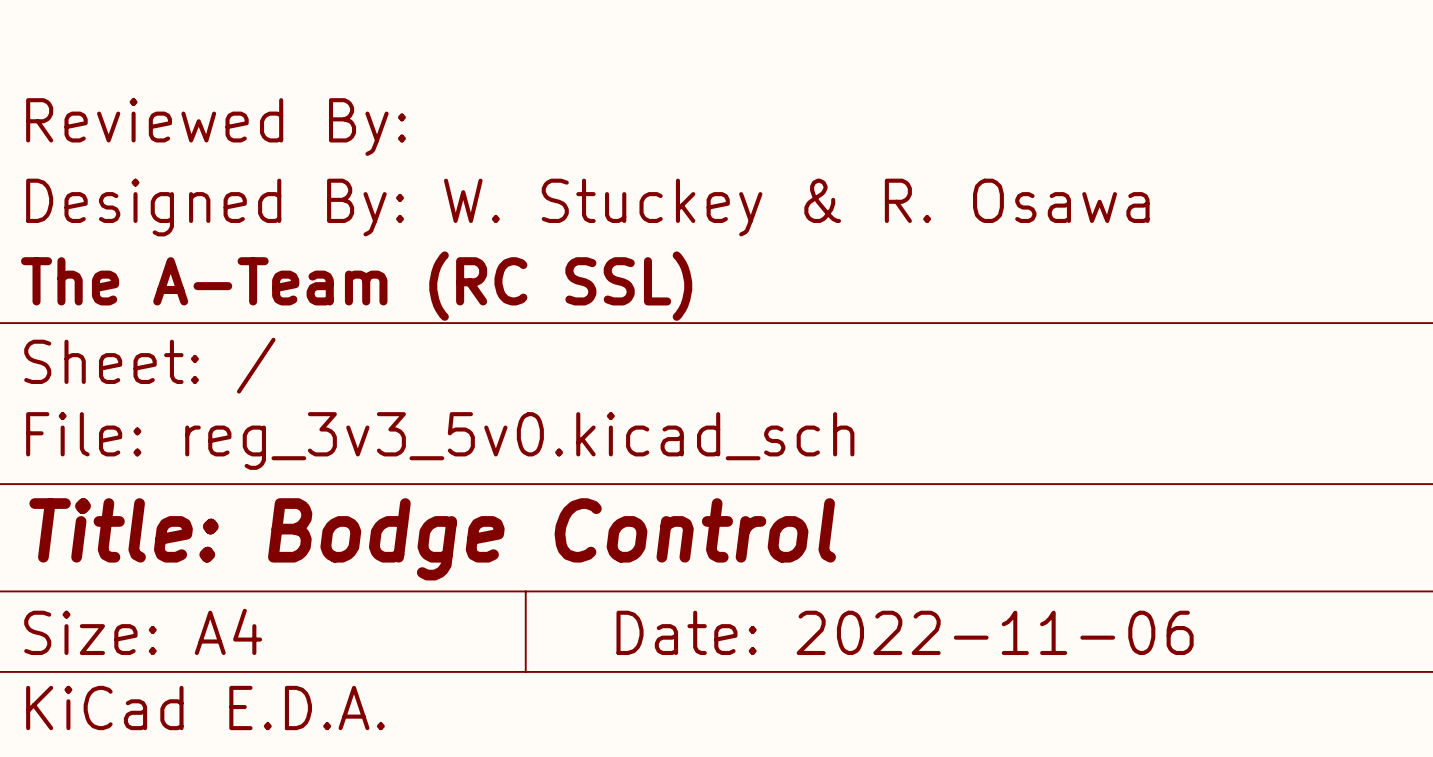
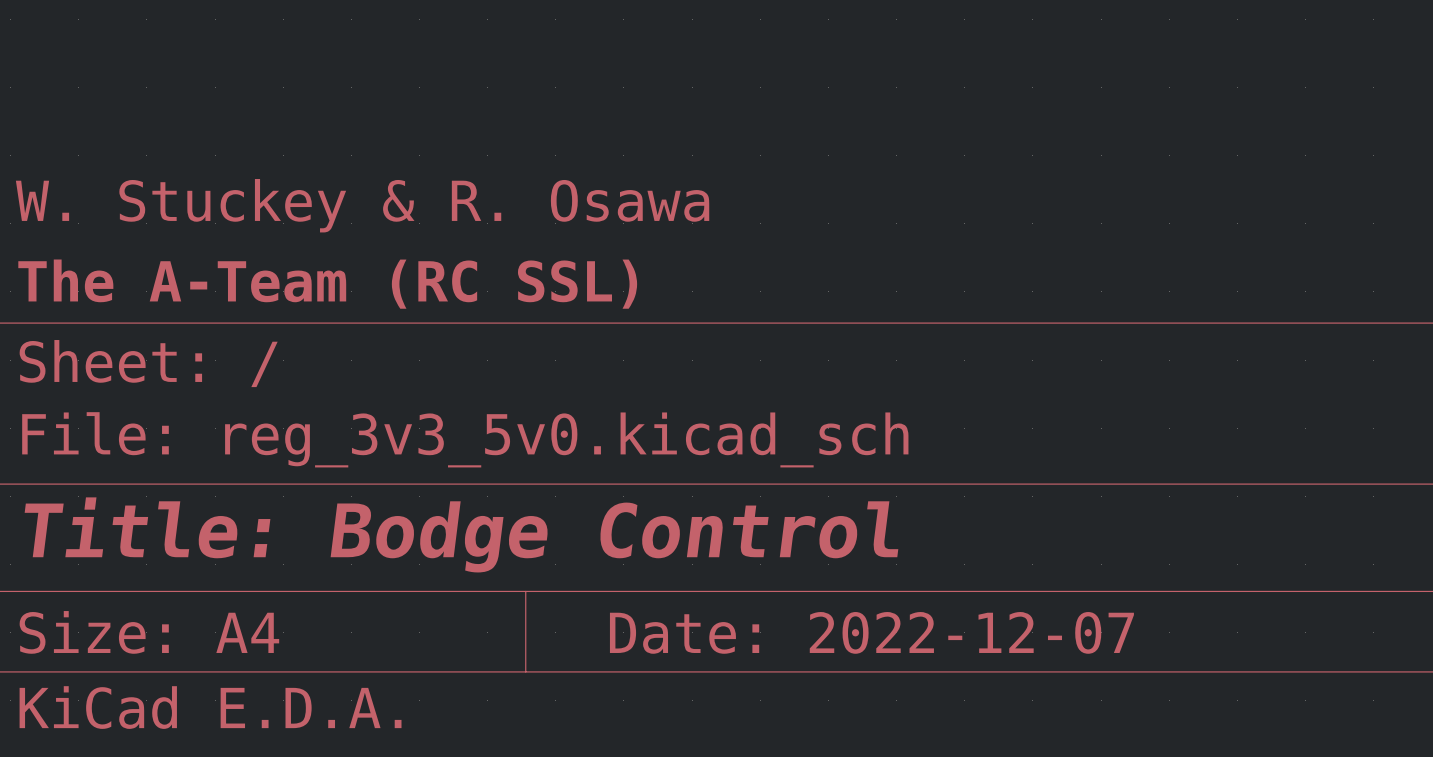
title block: Reviewed By: (216, 127) -> none
title block: Designed By: W. Stuckey & R. Osawa (587, 207) -> W. Stuckey & R. Osawa (362, 205)
title block: Date: 2022-11-06 (905, 632) -> Date: 2022-12-07 (871, 632)

